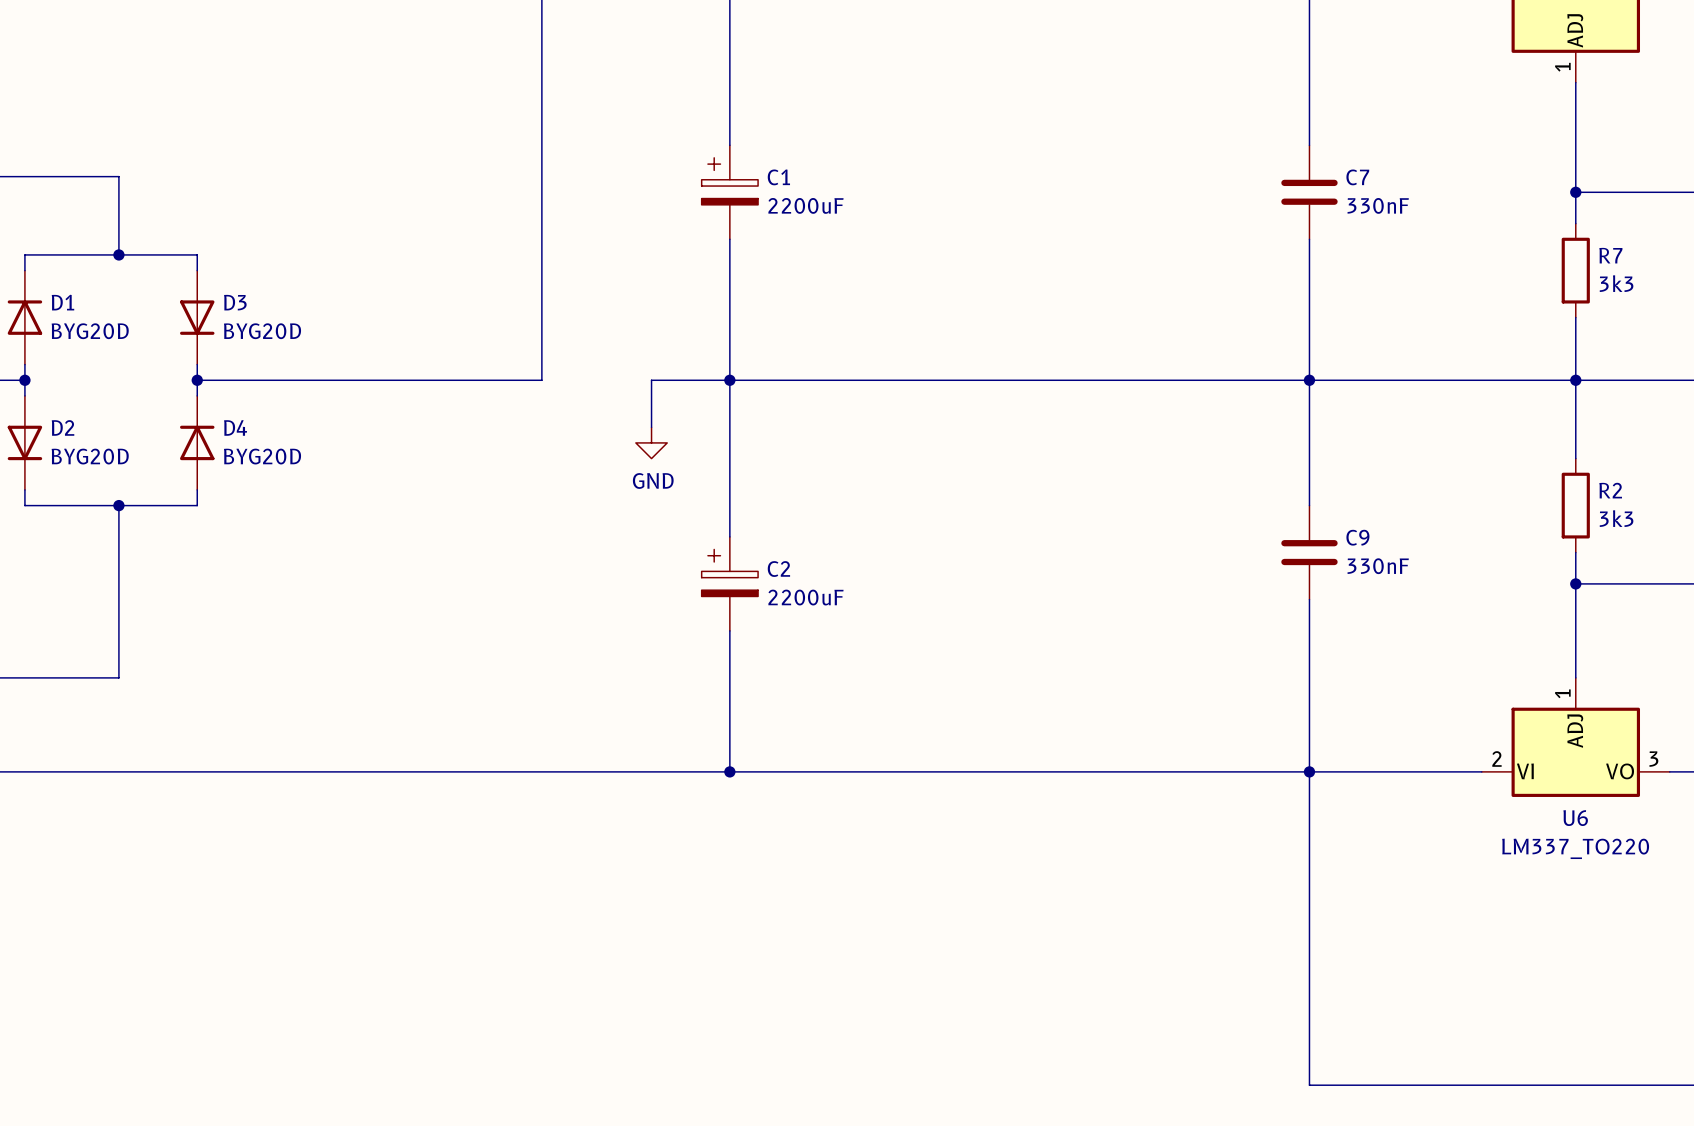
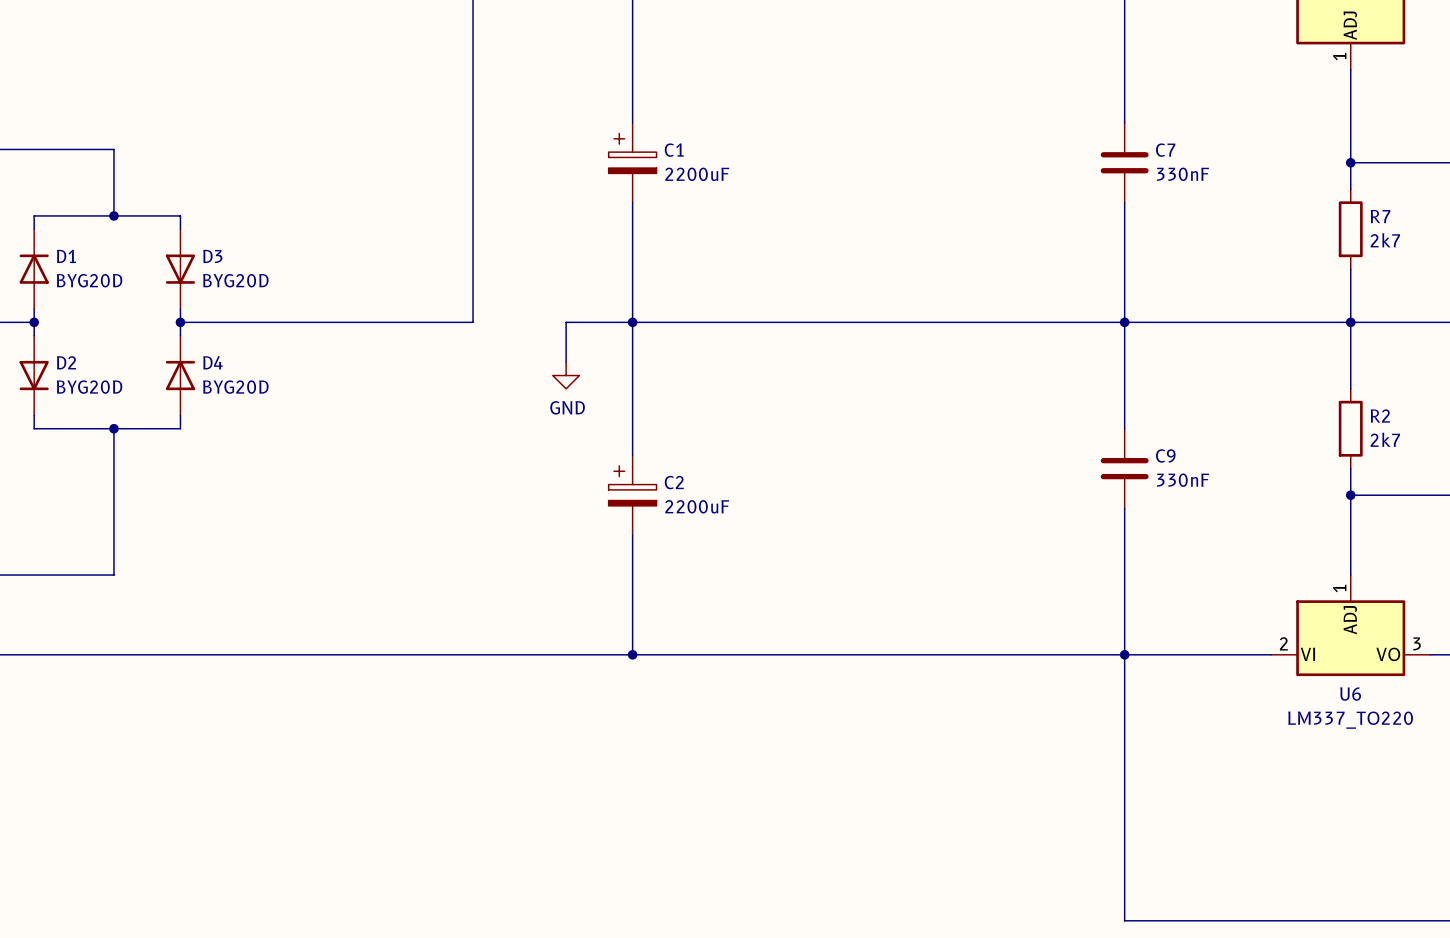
R7 value: 3k3 (1616, 283) -> 2k7 (1385, 240)
R2 value: 3k3 (1616, 518) -> 2k7 (1385, 439)

